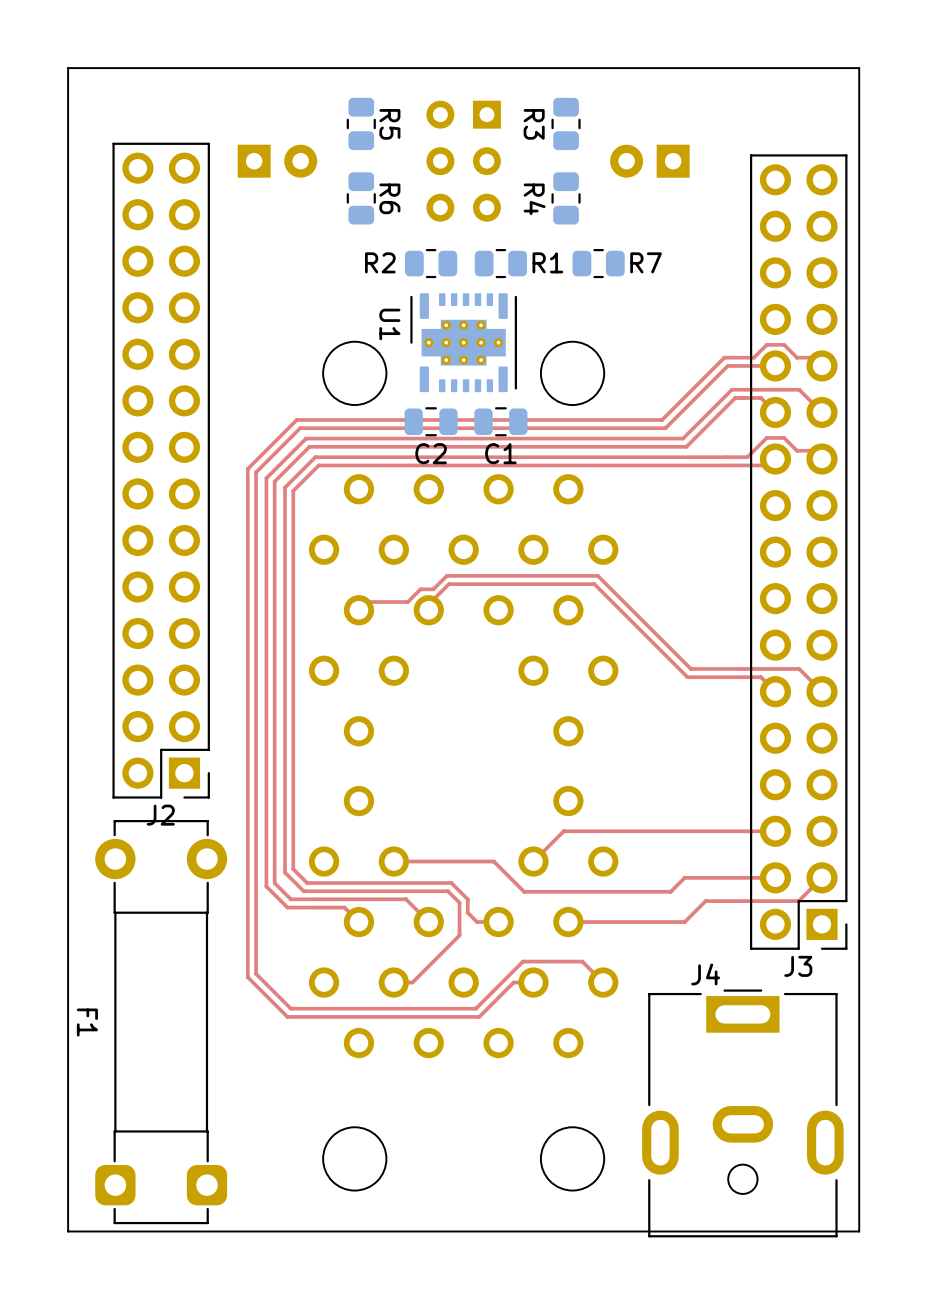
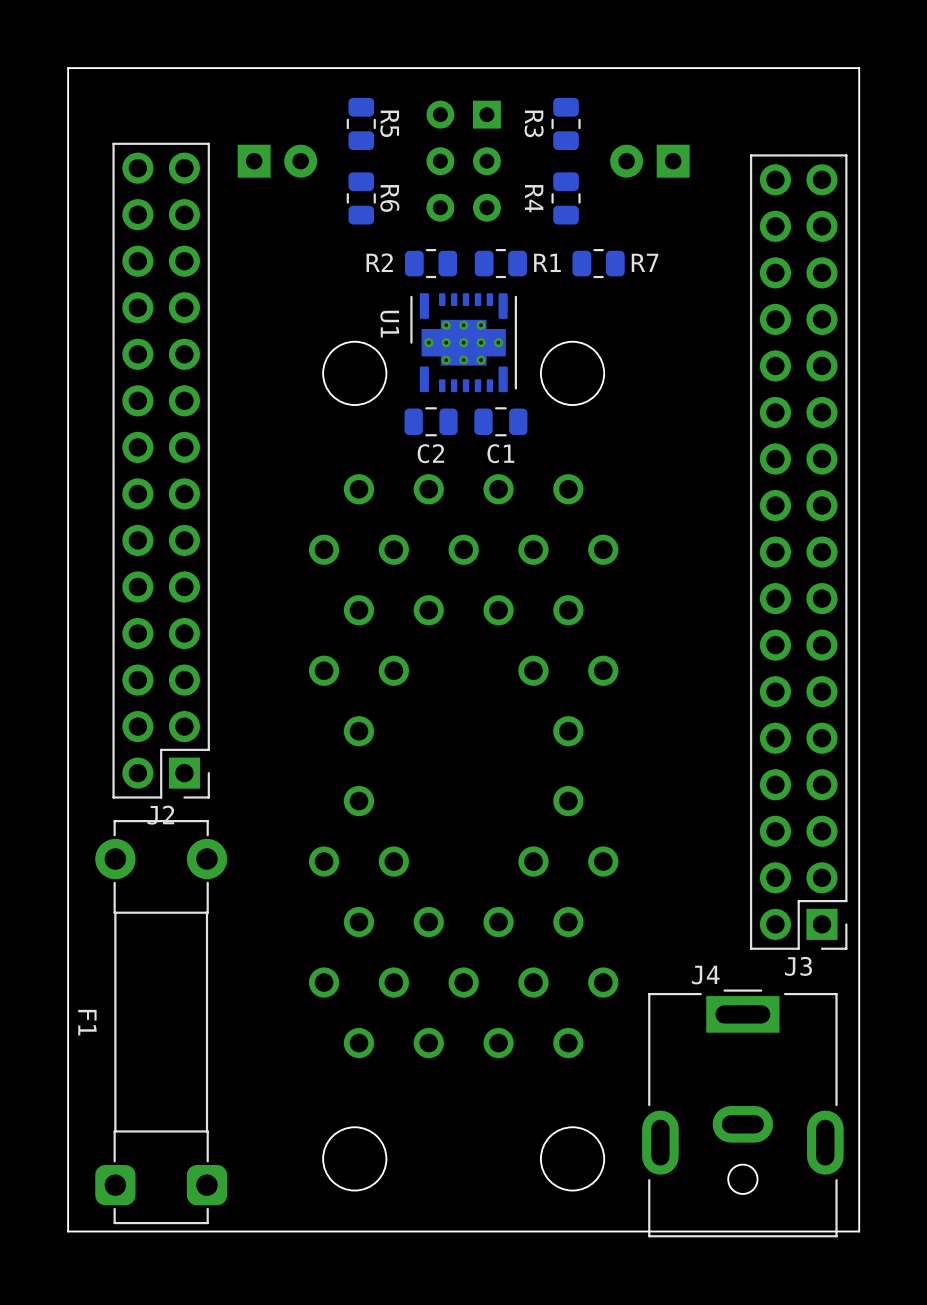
top track: (775, 365) (727, 365) (665, 428) (300, 428) (256, 472) (256, 973) (290, 1008) (475, 1008) (522, 961) (582, 961) (603, 982) -> none
top track: (821, 365) (813, 357) (797, 357) (784, 344) (766, 344) (753, 357) (724, 357) (662, 419) (296, 419) (247, 468) (247, 977) (287, 1016) (479, 1016) (513, 982) (533, 982) -> none
top track: (740, 397) (760, 397) (775, 412) -> none
top track: (745, 397) (735, 397) (686, 446) (309, 446) (274, 481) (274, 883) (290, 899) (406, 899) (428, 922) -> none
top track: (821, 412) (799, 389) (731, 389) (683, 438) (306, 438) (266, 478) (266, 886) (287, 907) (344, 907) (358, 922) -> none
top track: (775, 459) (769, 465) (318, 465) (293, 490) (293, 869) (307, 883) (451, 883) (467, 899) (467, 912) (477, 922) (498, 922) -> none
top track: (821, 459) (813, 450) (797, 450) (784, 437) (766, 437) (747, 457) (315, 457) (285, 487) (285, 872) (303, 891) (447, 891) (459, 902) (459, 935) (412, 982) (393, 982) -> none
top track: (358, 610) (367, 602) (407, 602) (420, 589) (433, 589) (446, 575) (597, 575) (690, 668) (799, 668) (821, 691) -> none
top track: (428, 610) (428, 604) (448, 584) (594, 584) (687, 677) (760, 677) (775, 691) -> none
top track: (775, 831) (563, 831) (533, 861) -> none
top track: (393, 861) (493, 861) (524, 891) (670, 891) (684, 877) (775, 877) -> none
top track: (821, 877) (798, 901) (705, 901) (684, 922) (568, 922) -> none

